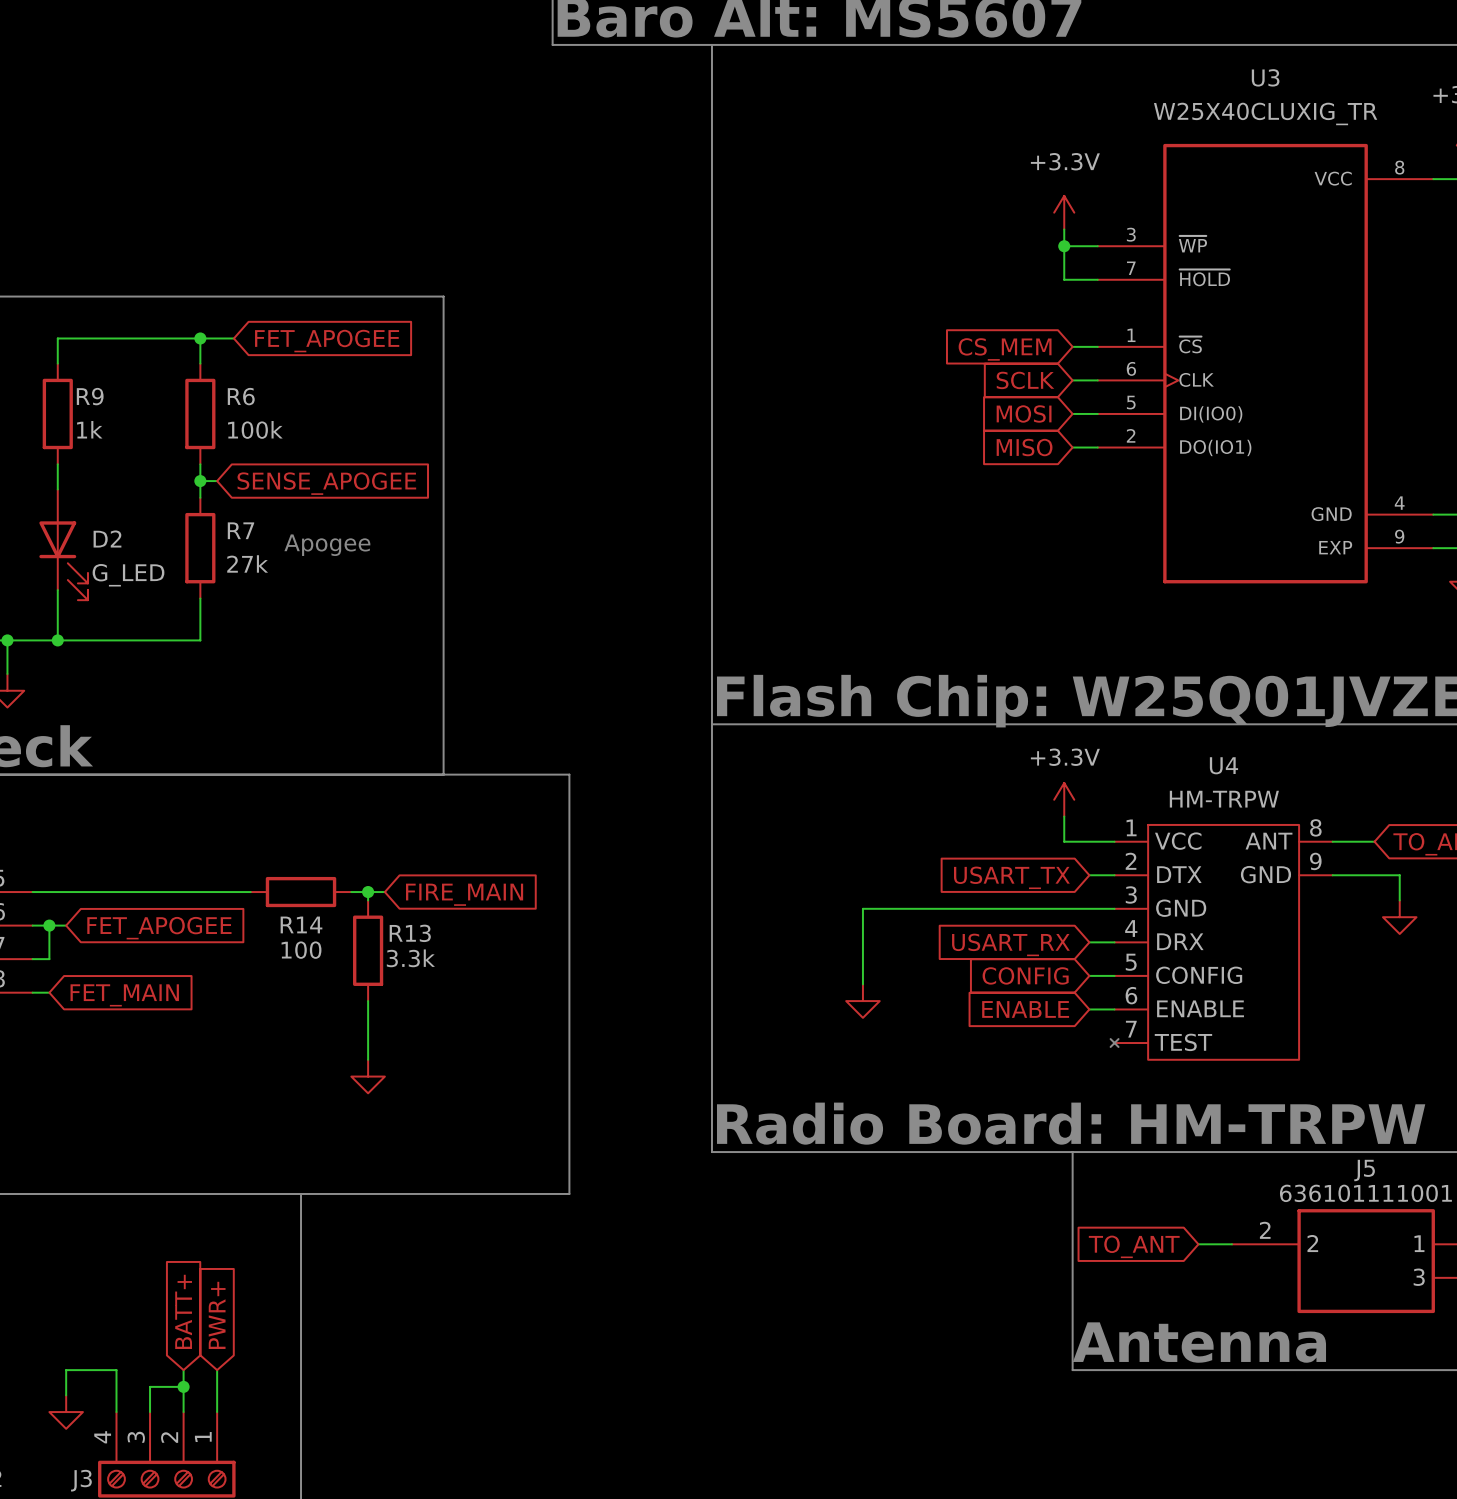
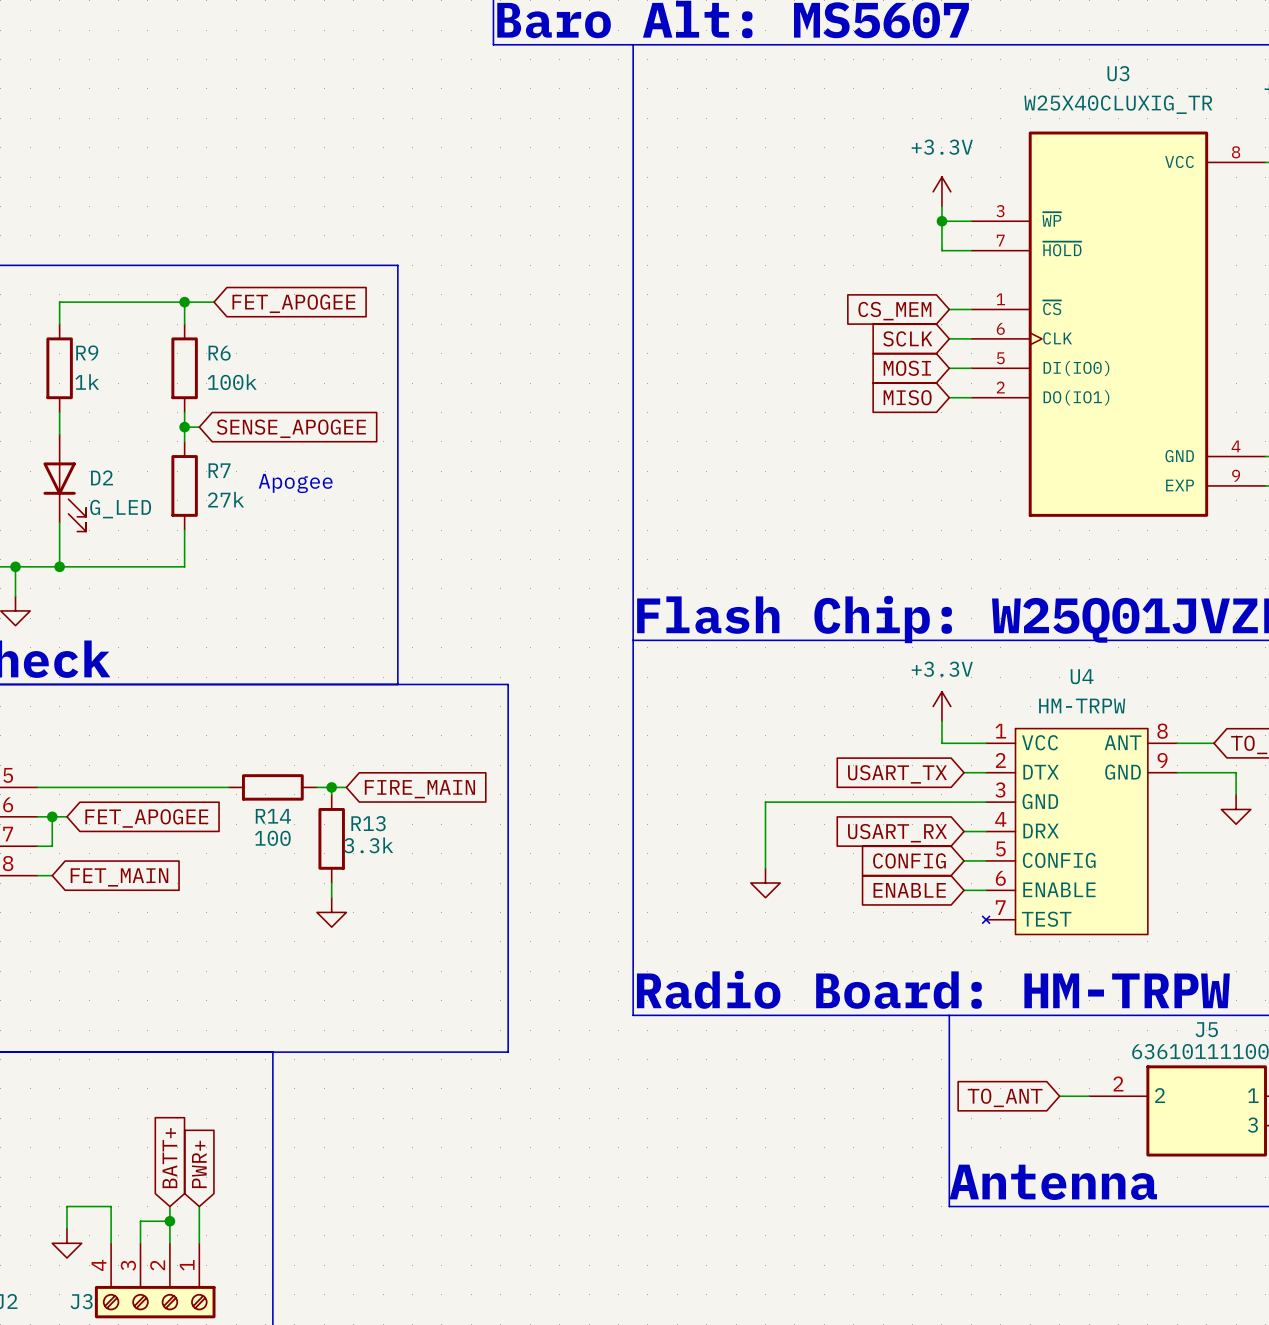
wire: (368, 1017) (368, 1059) -> none
power symbol position: (368, 1076) -> (331, 912)

